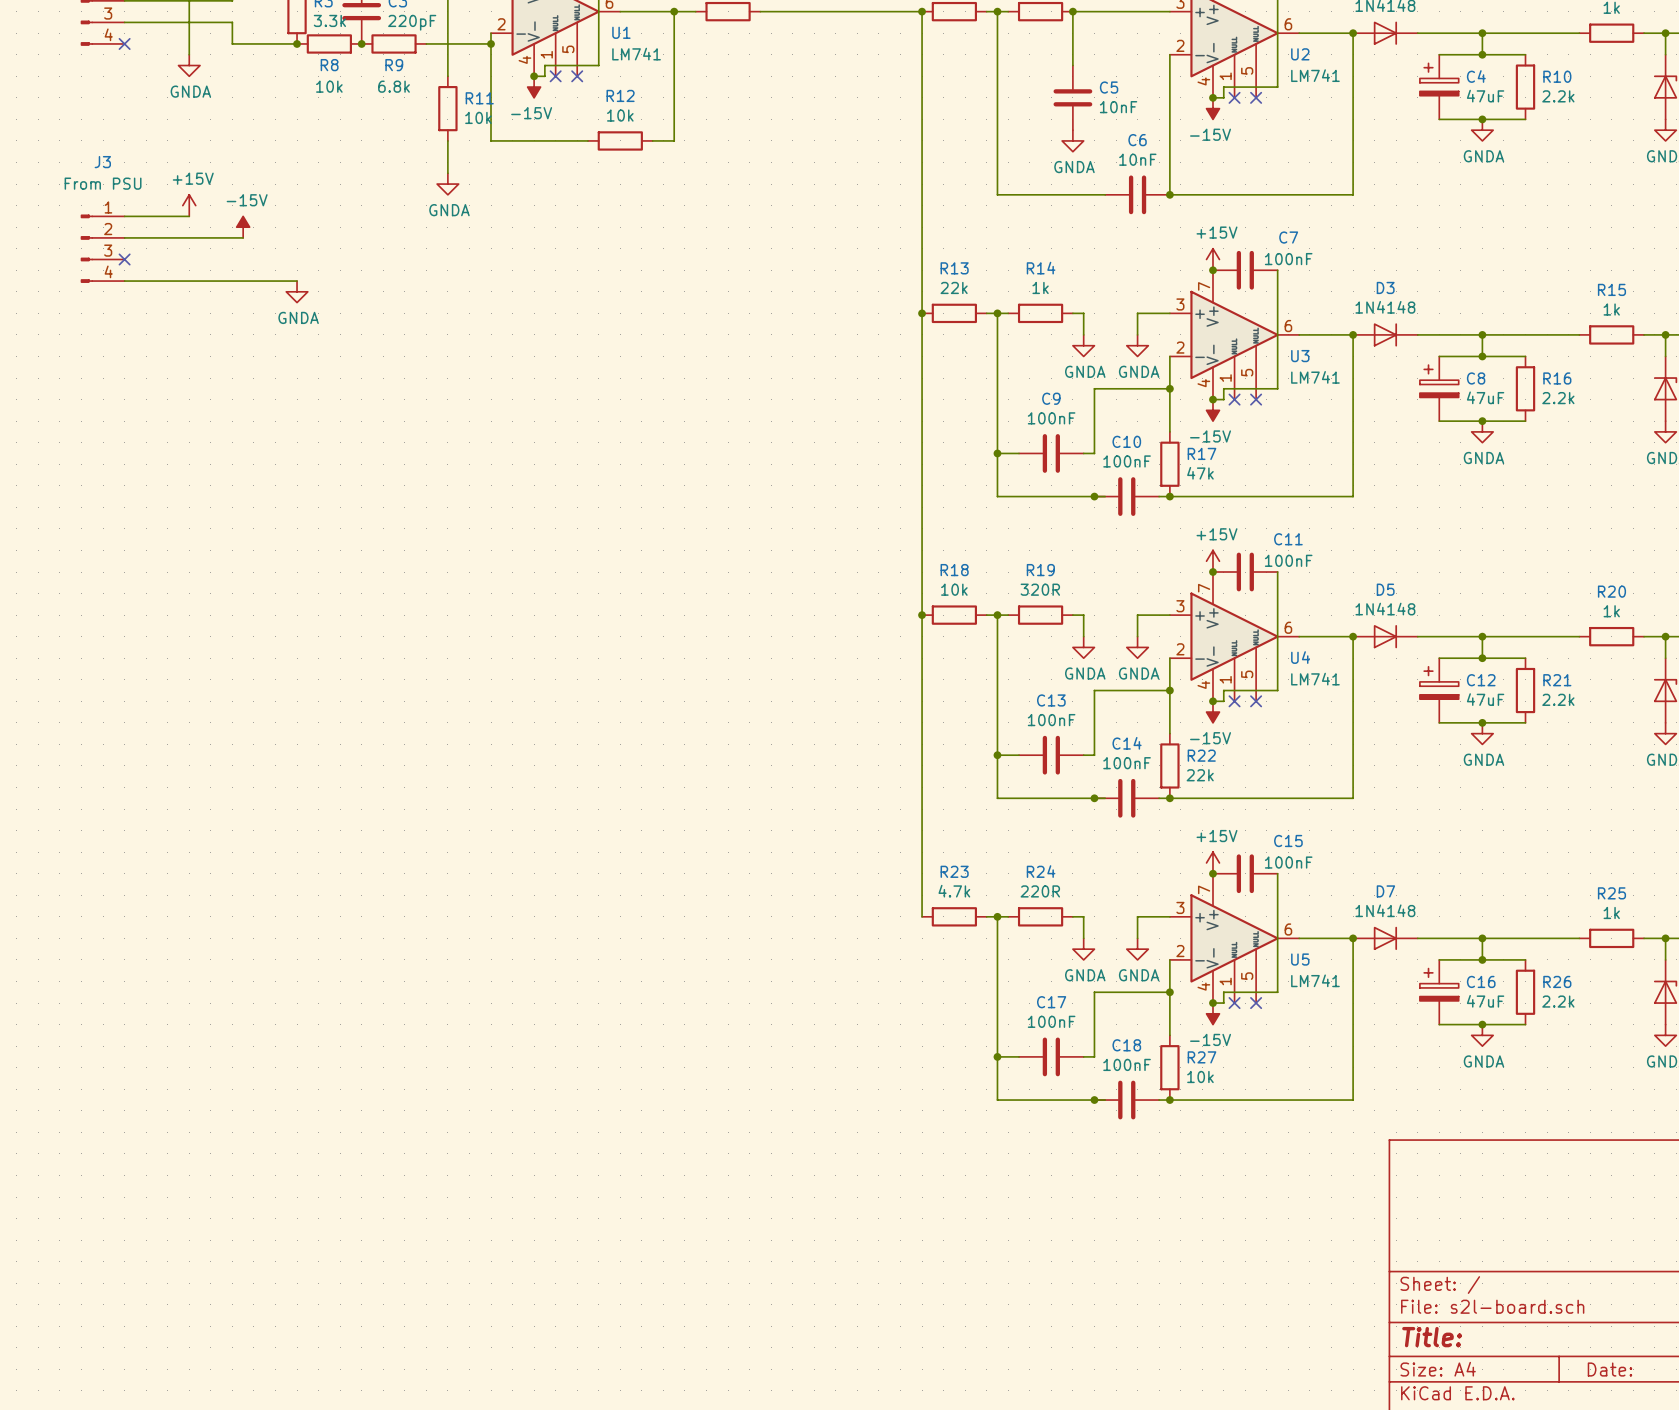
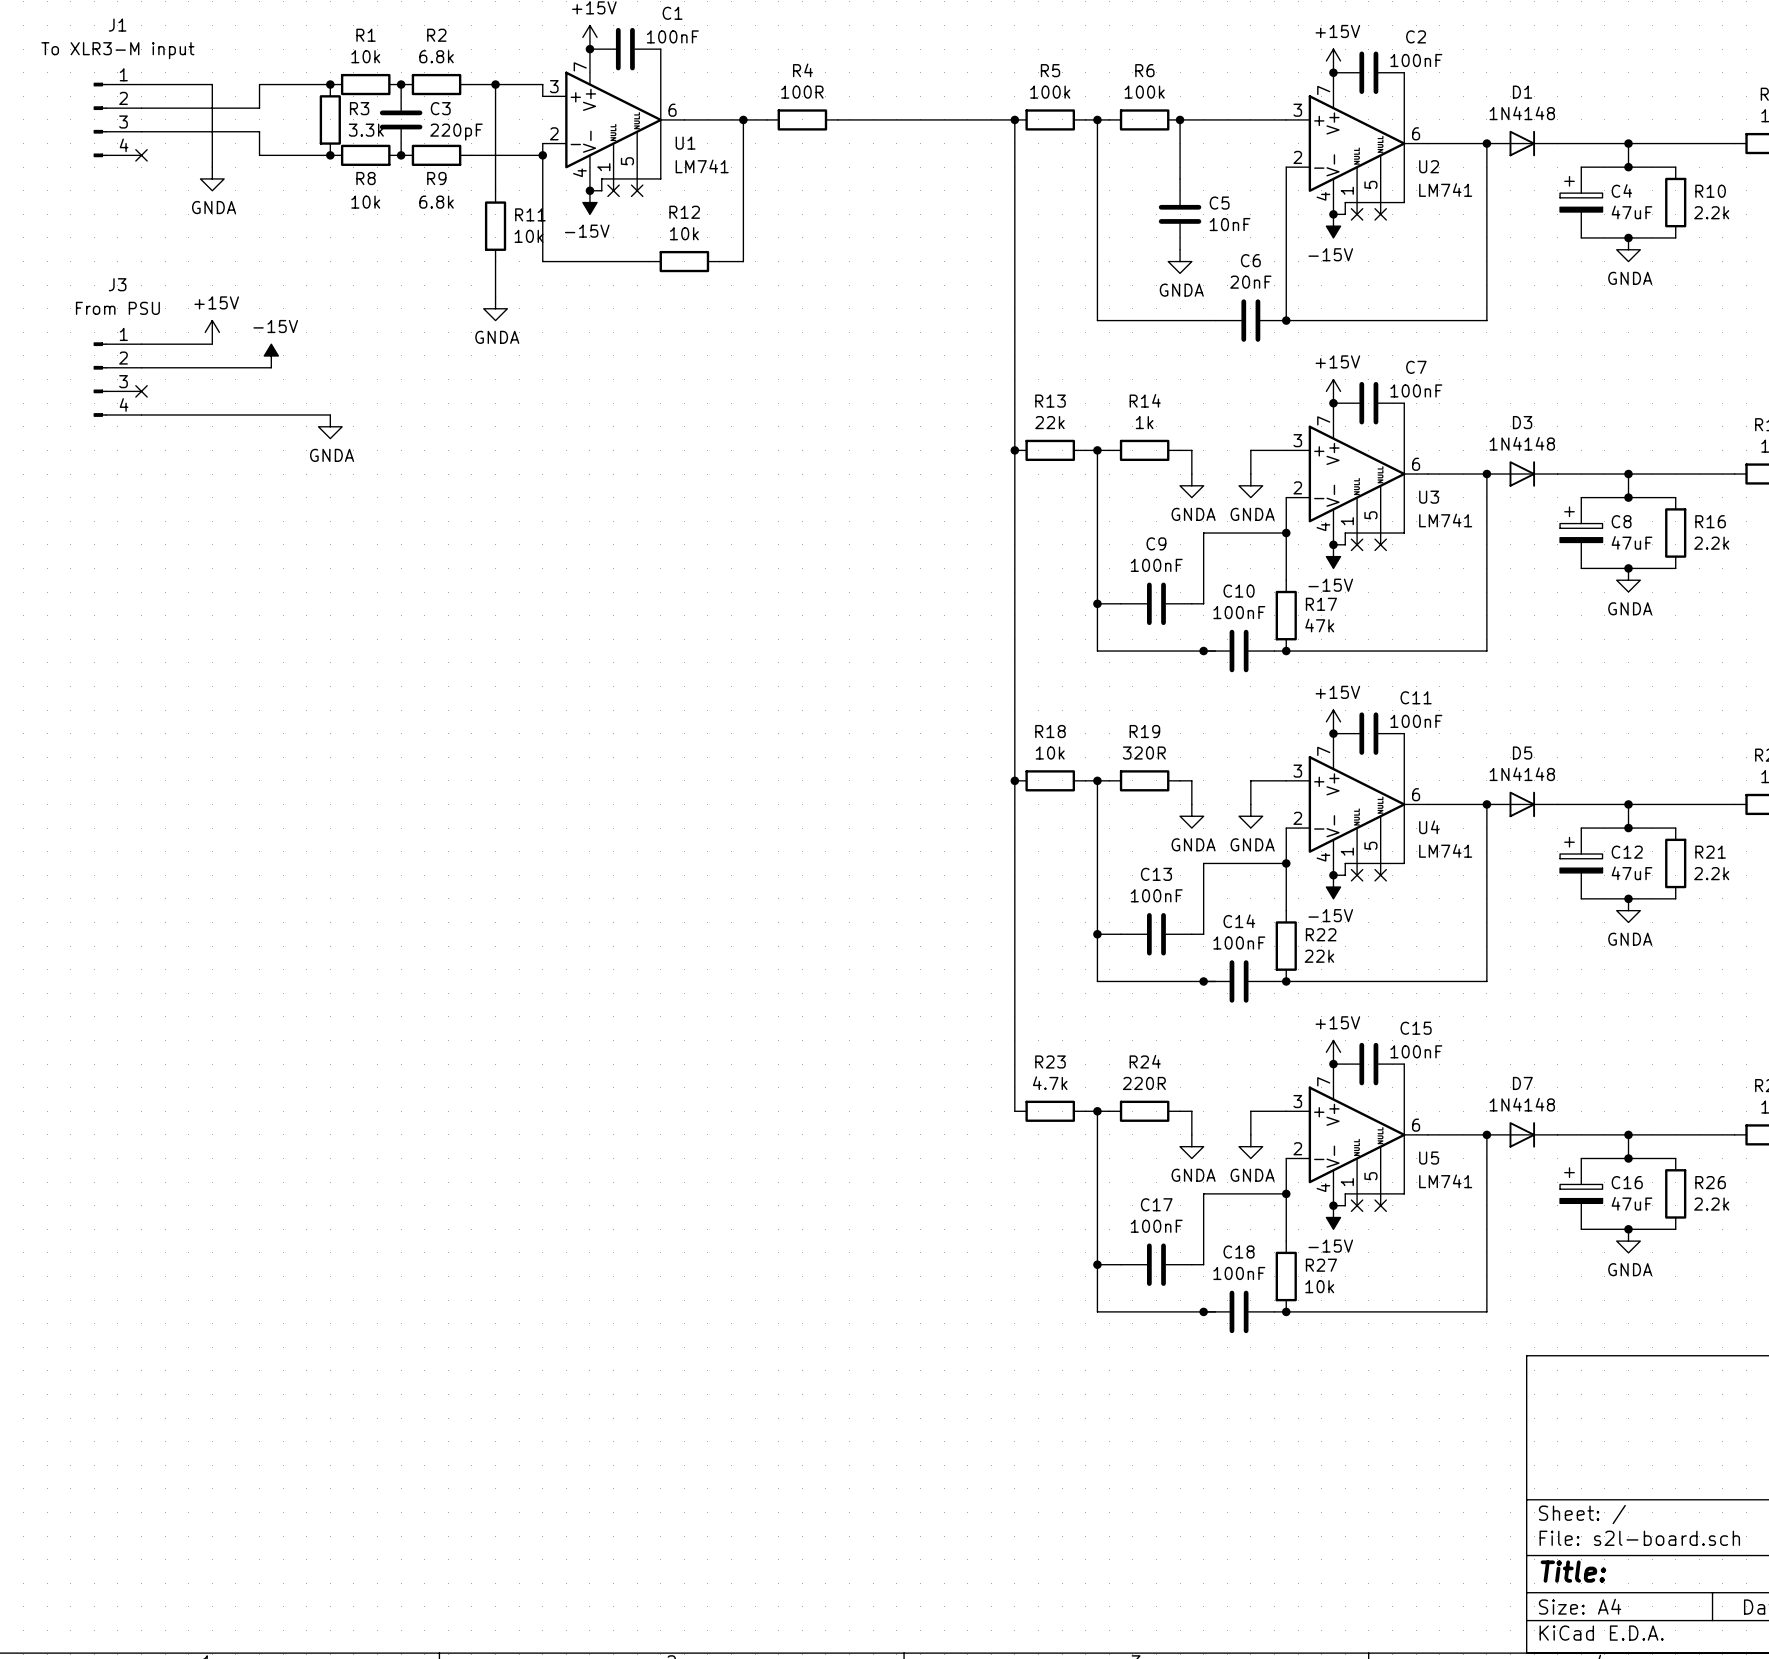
C6 value: 10nF (1137, 159) -> 20nF (1250, 282)

